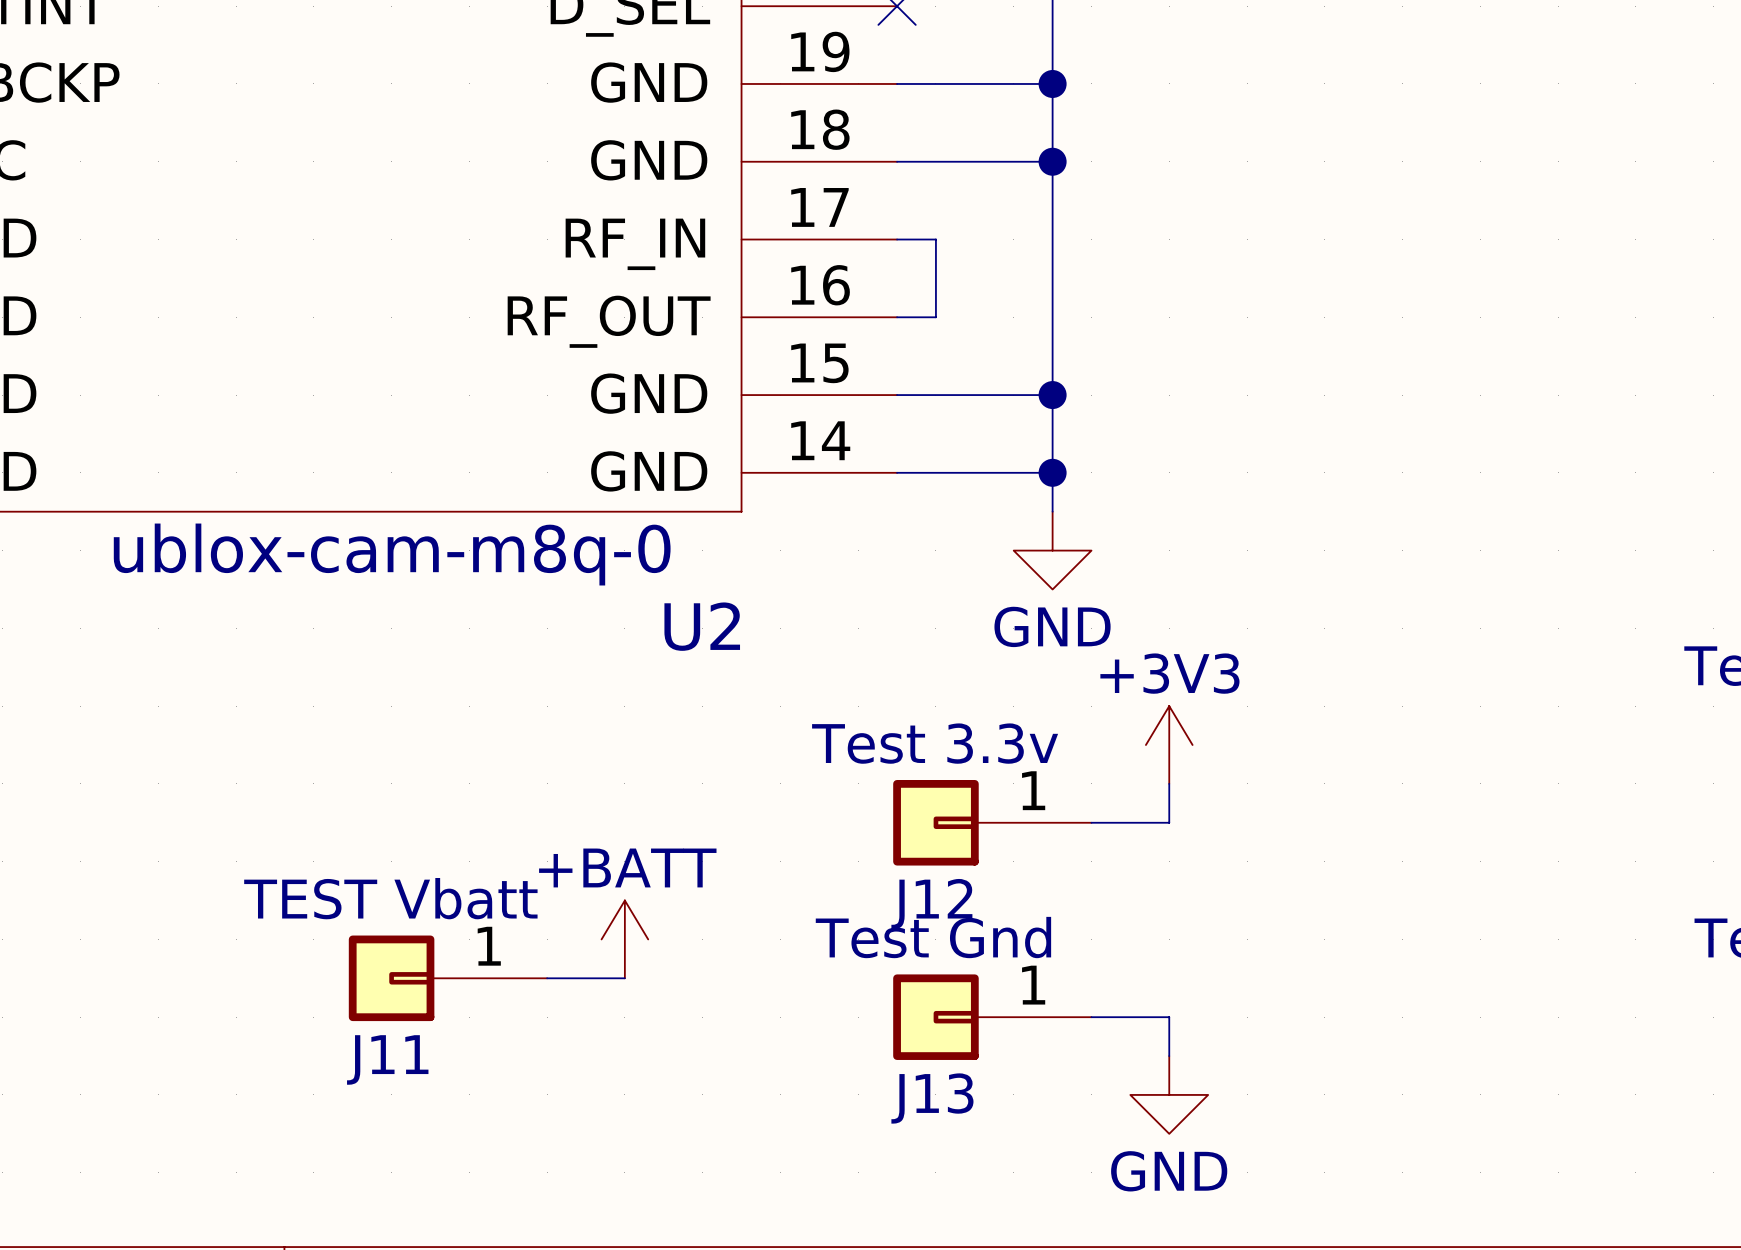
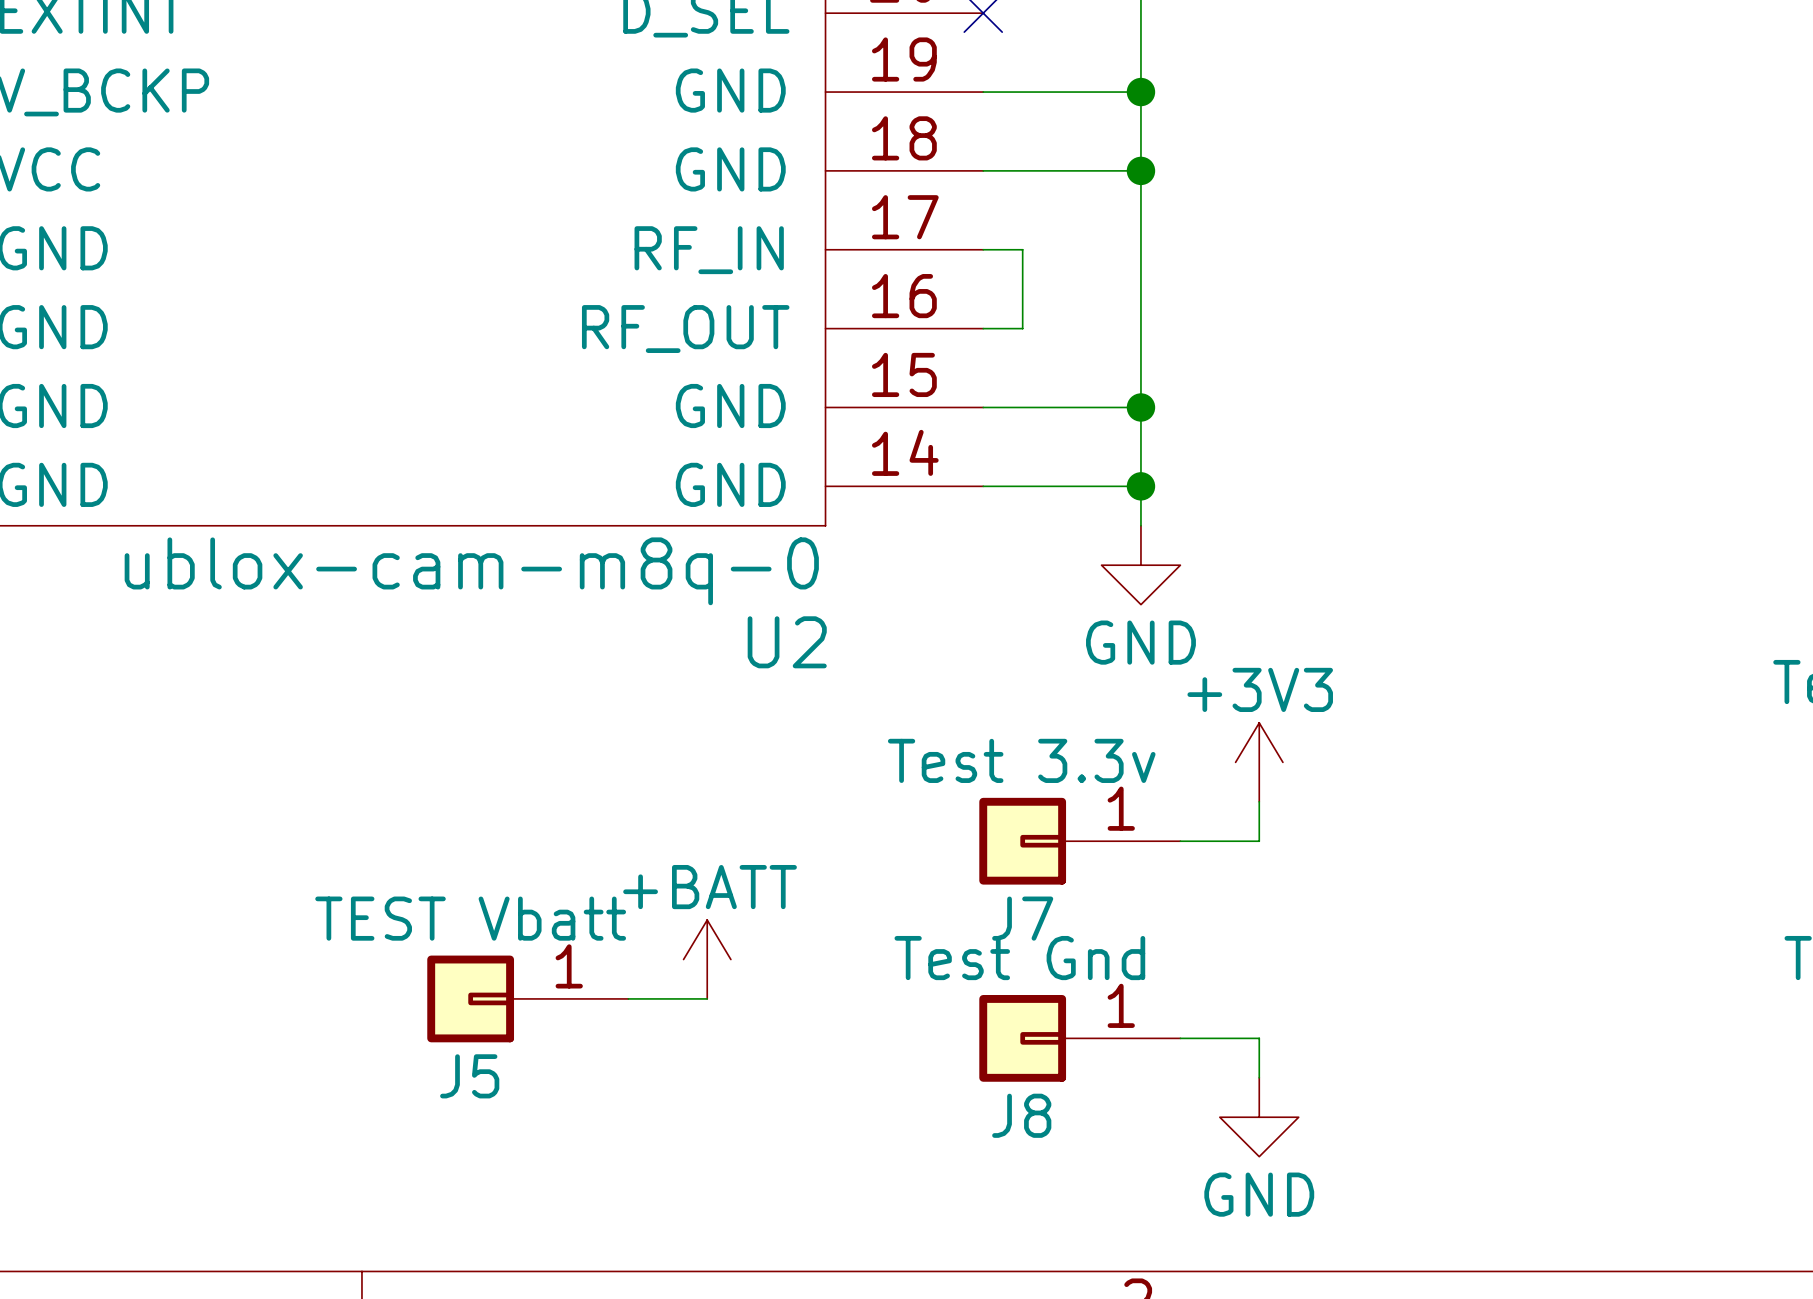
J12 name: J12 (931, 904) -> J7 (1022, 918)
J11 name: J11 (387, 1059) -> J5 (469, 1076)
J13 name: J13 (932, 1098) -> J8 (1021, 1115)

